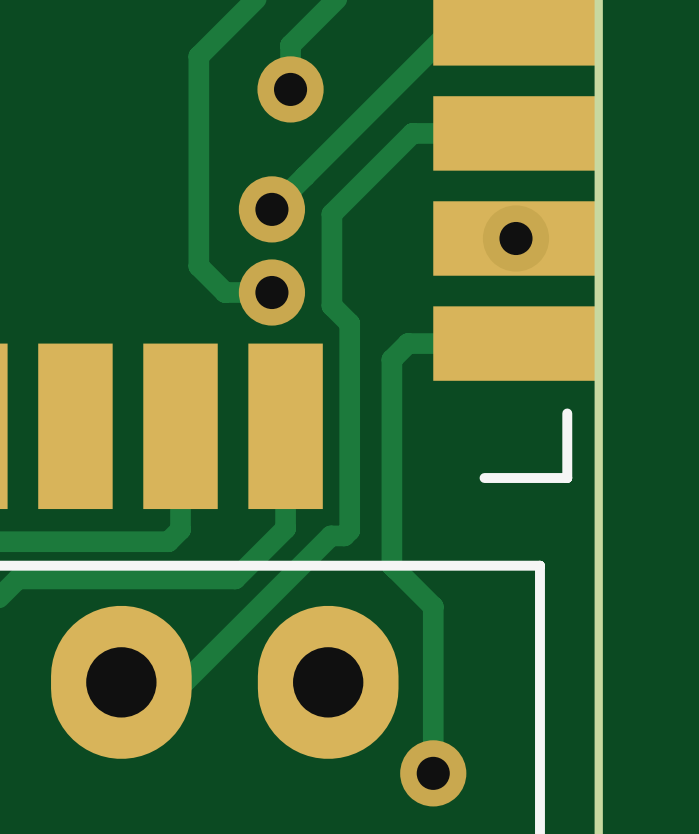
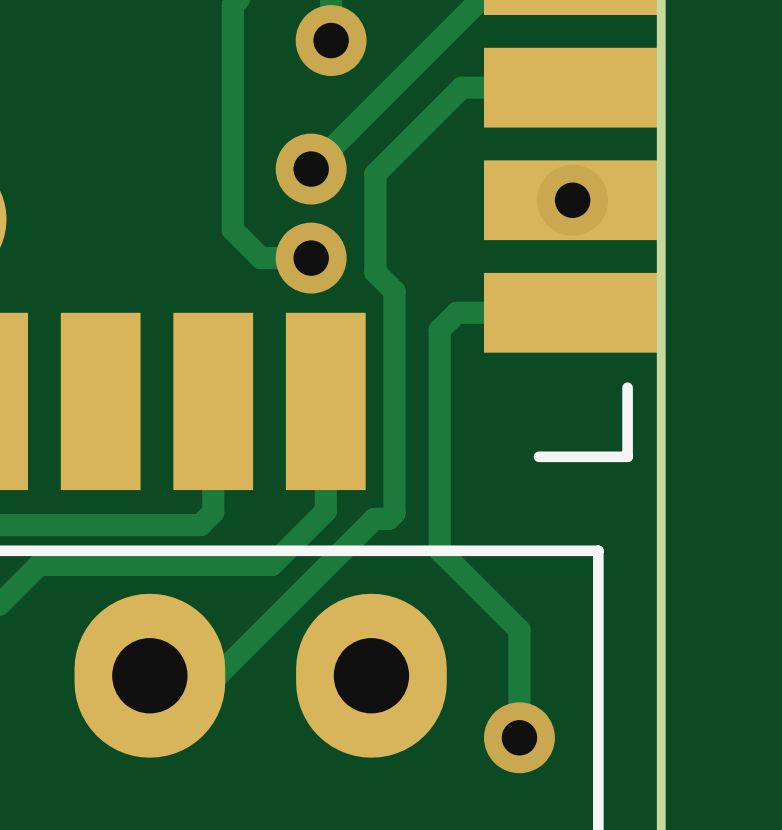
track: (433, 606) (433, 773) -> (484, 594) (519, 630) (519, 737)
via position: (433, 773) -> (519, 737)

